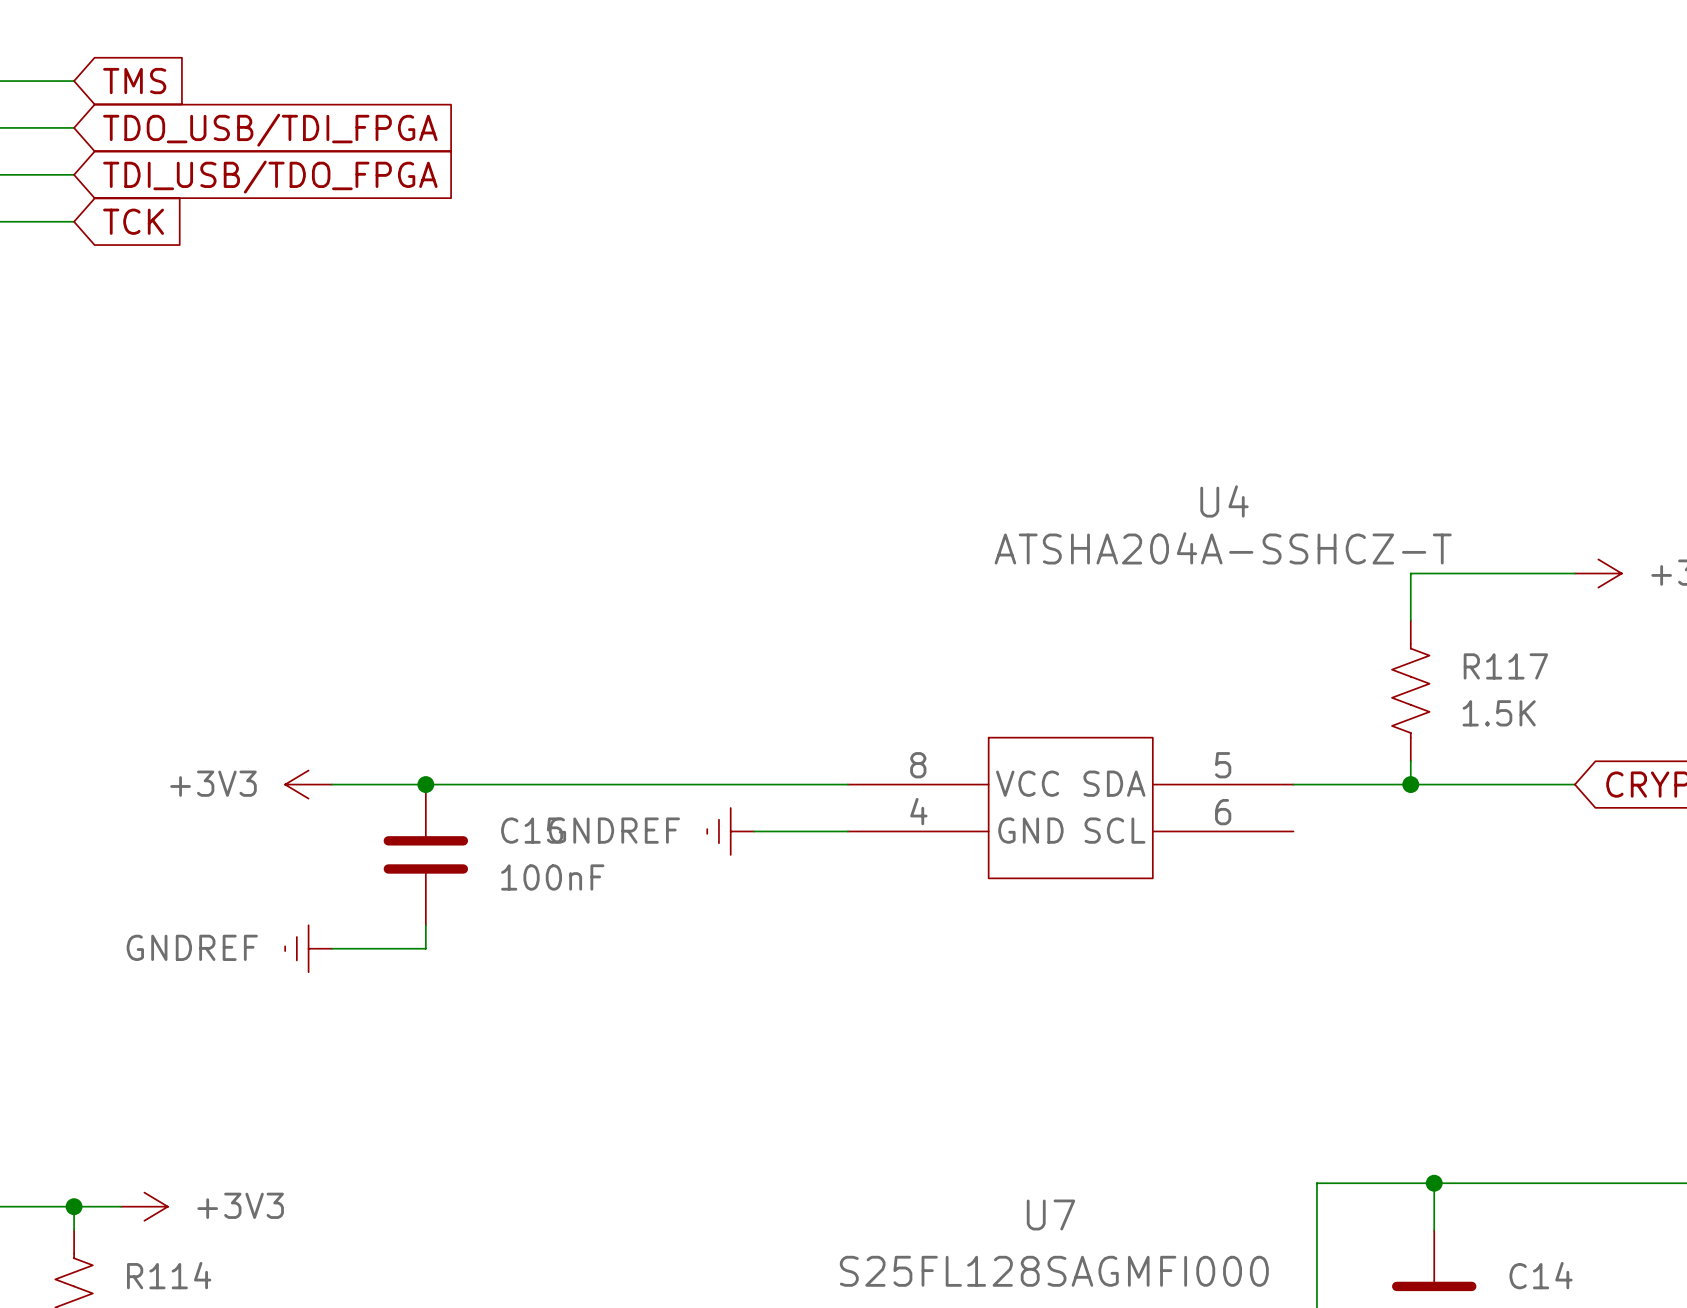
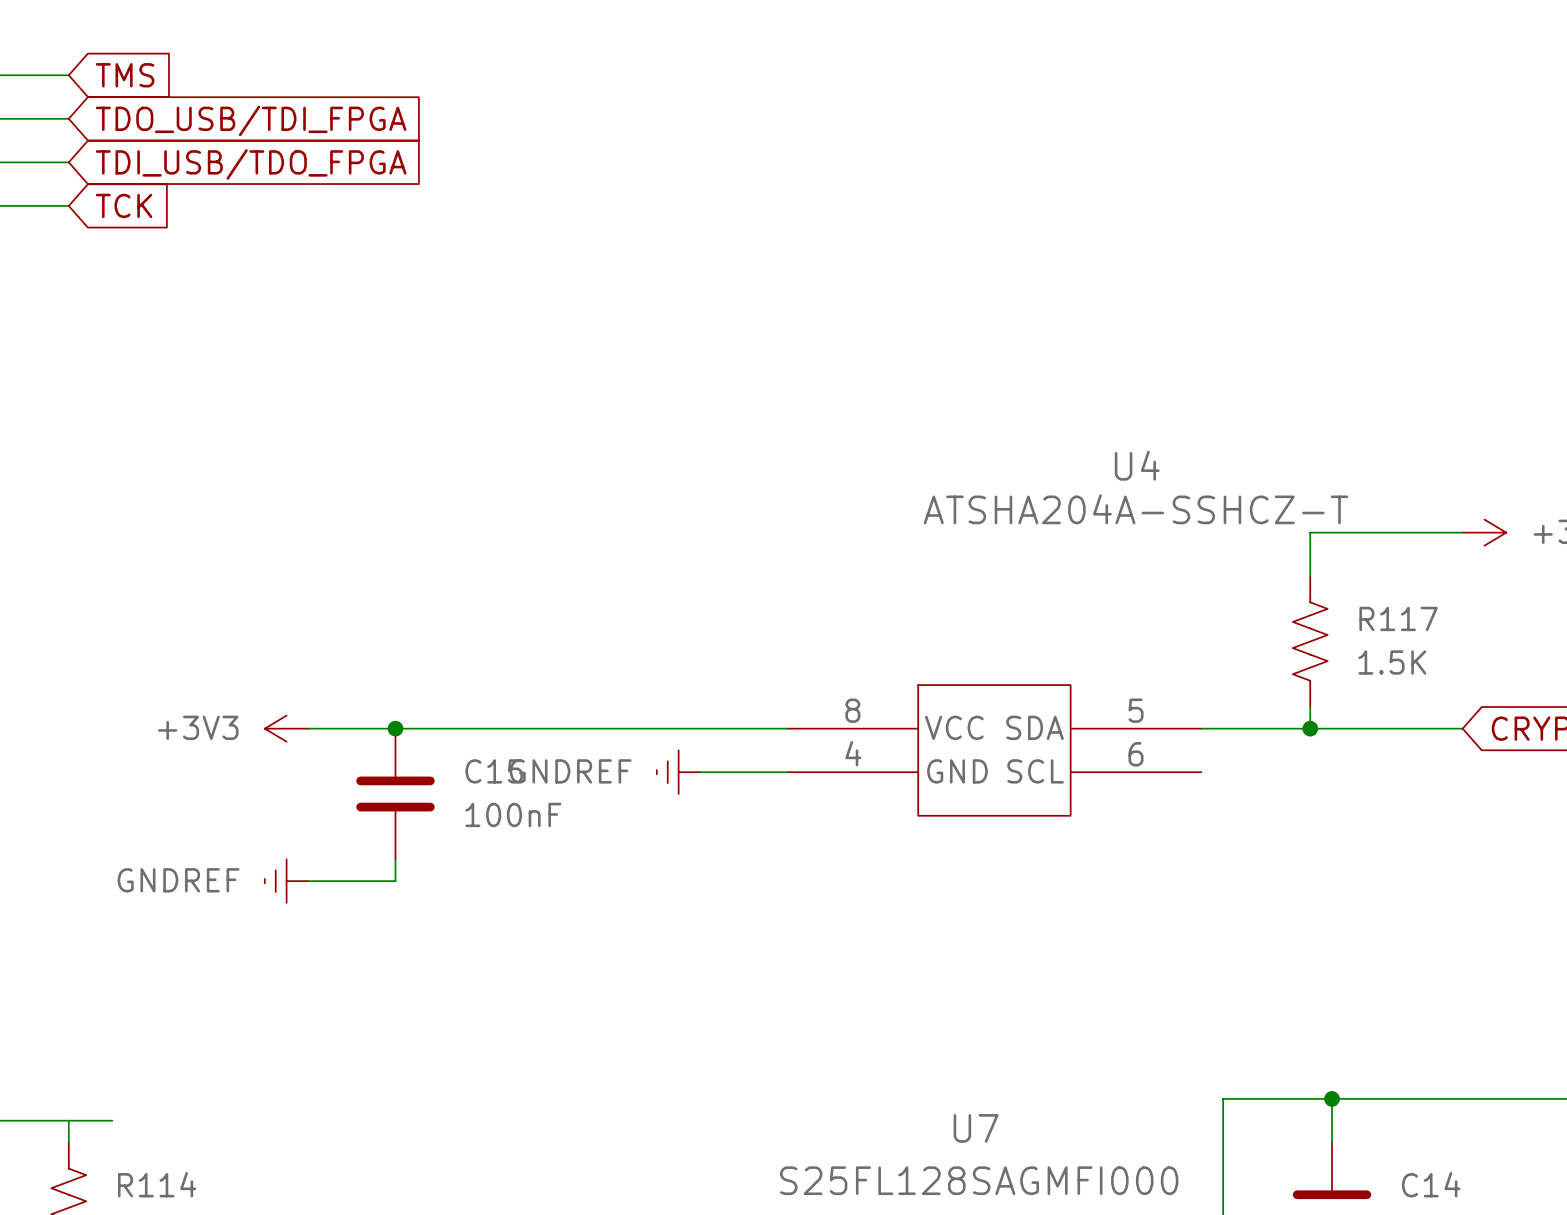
junction: (74, 1206) -> none
power symbol: +3V3 (144, 1206) -> none

